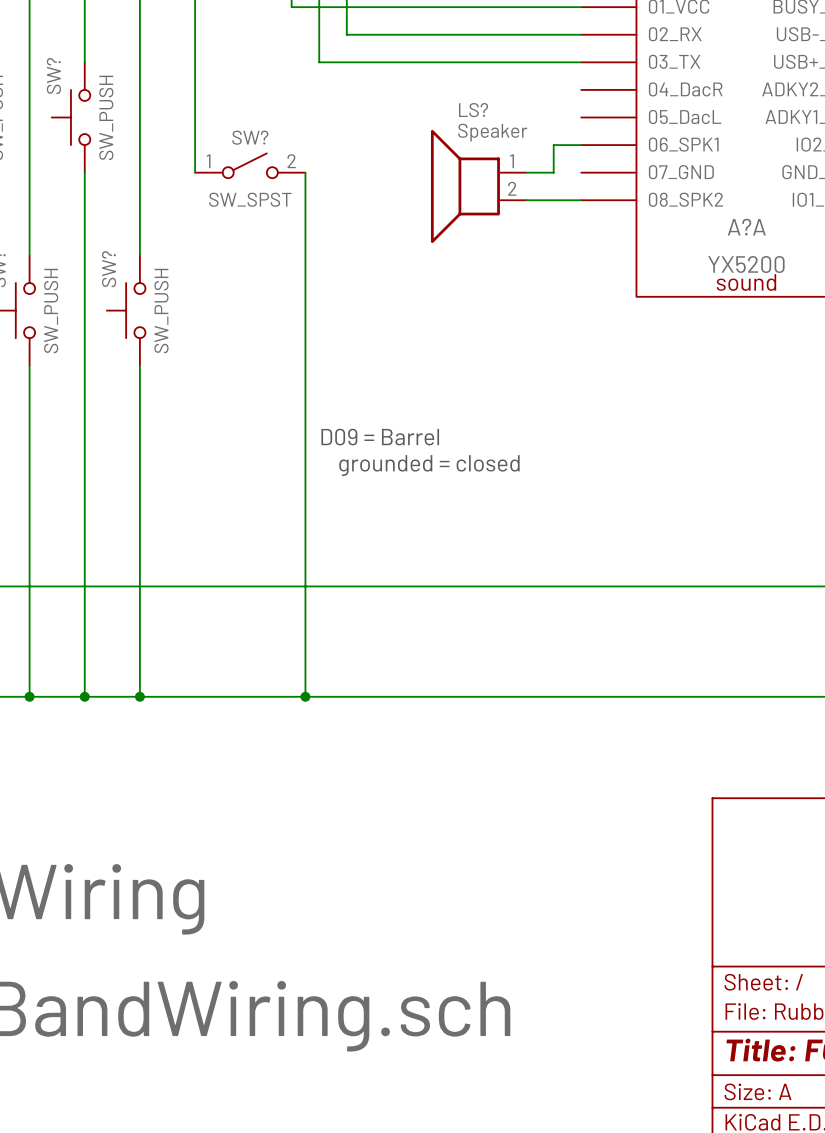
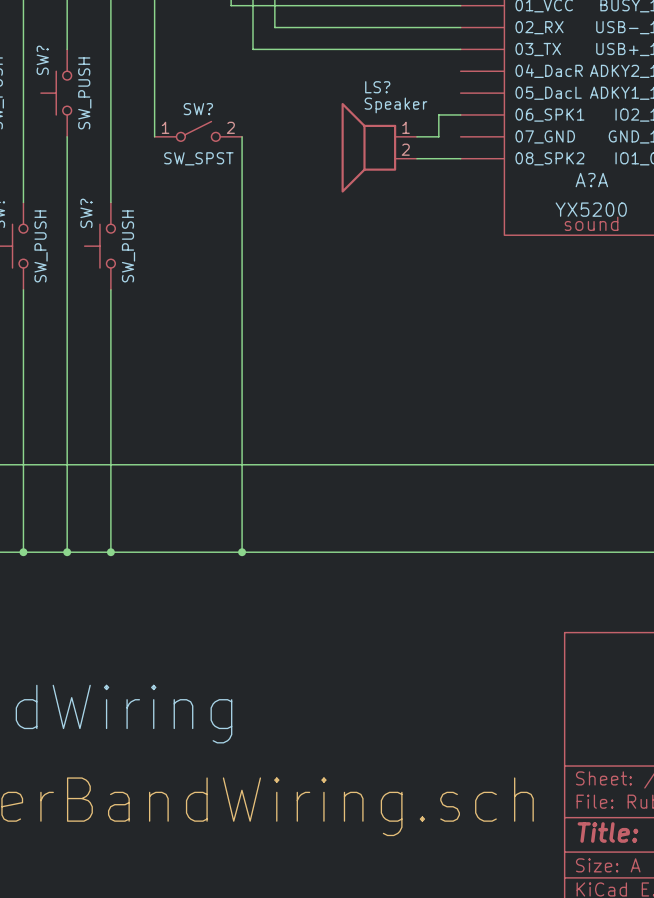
text: D09 = Barrel (380, 437) -> none
text: grounded = closed (429, 465) -> none

